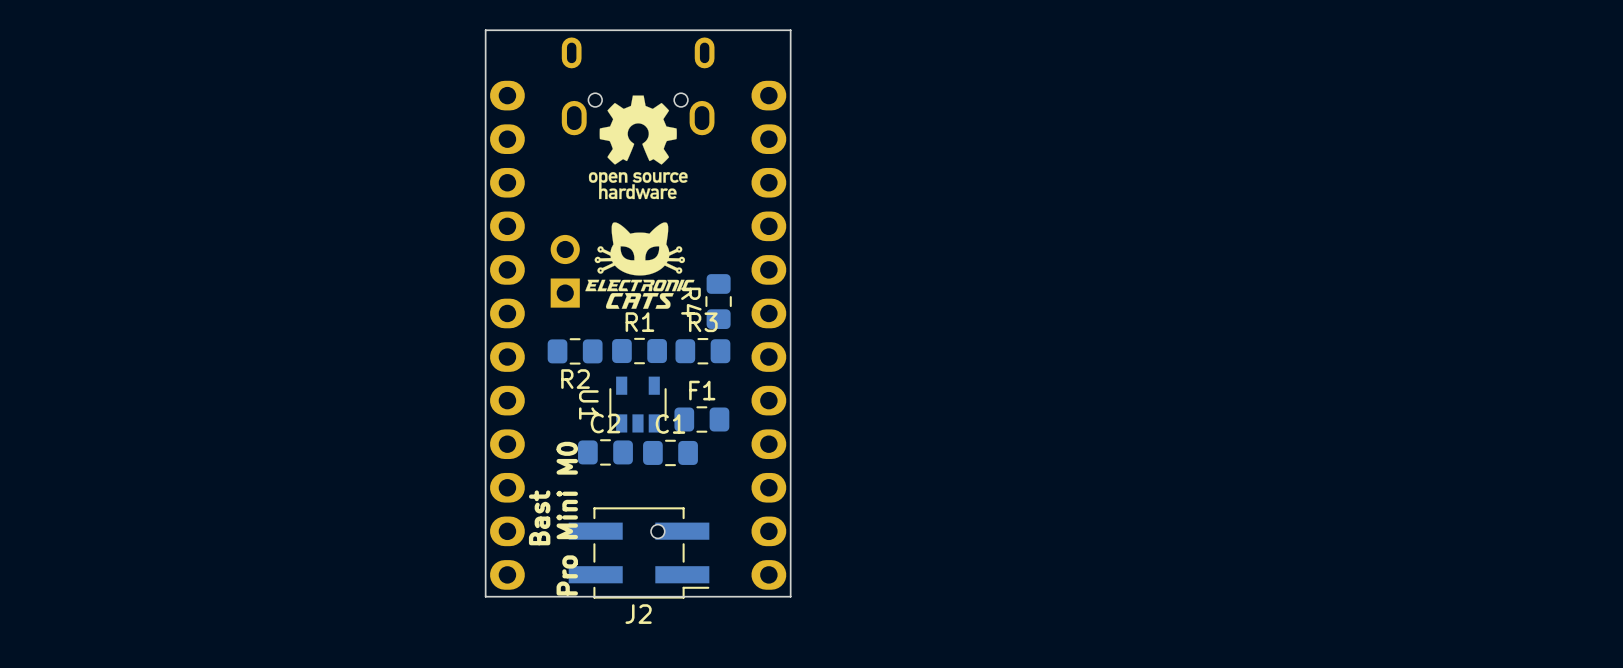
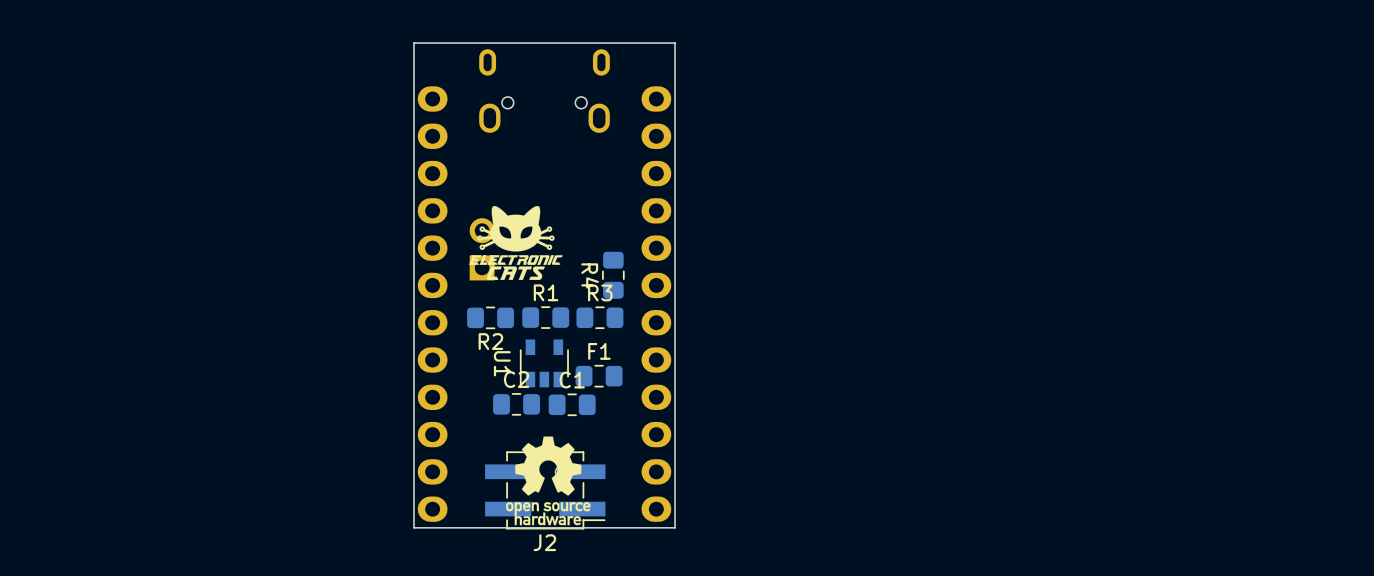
drawing position: (638, 147) -> (548, 480)
drawing position: (639, 265) -> (515, 243)
text: Bast (539, 517) -> none
text: Pro Mini M0 (567, 518) -> none

